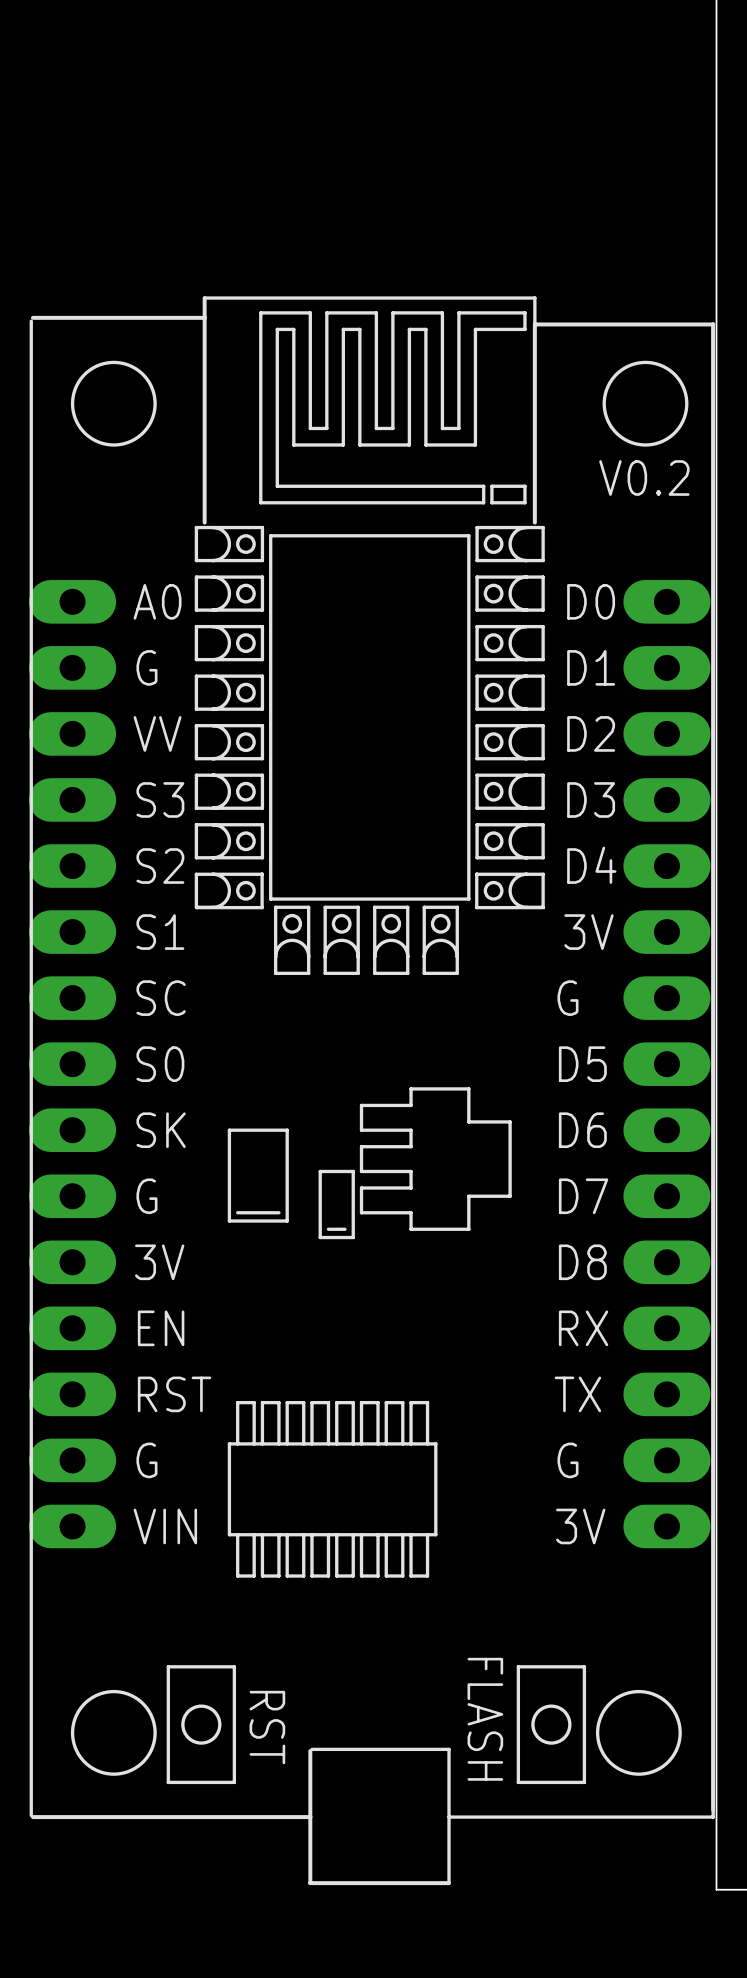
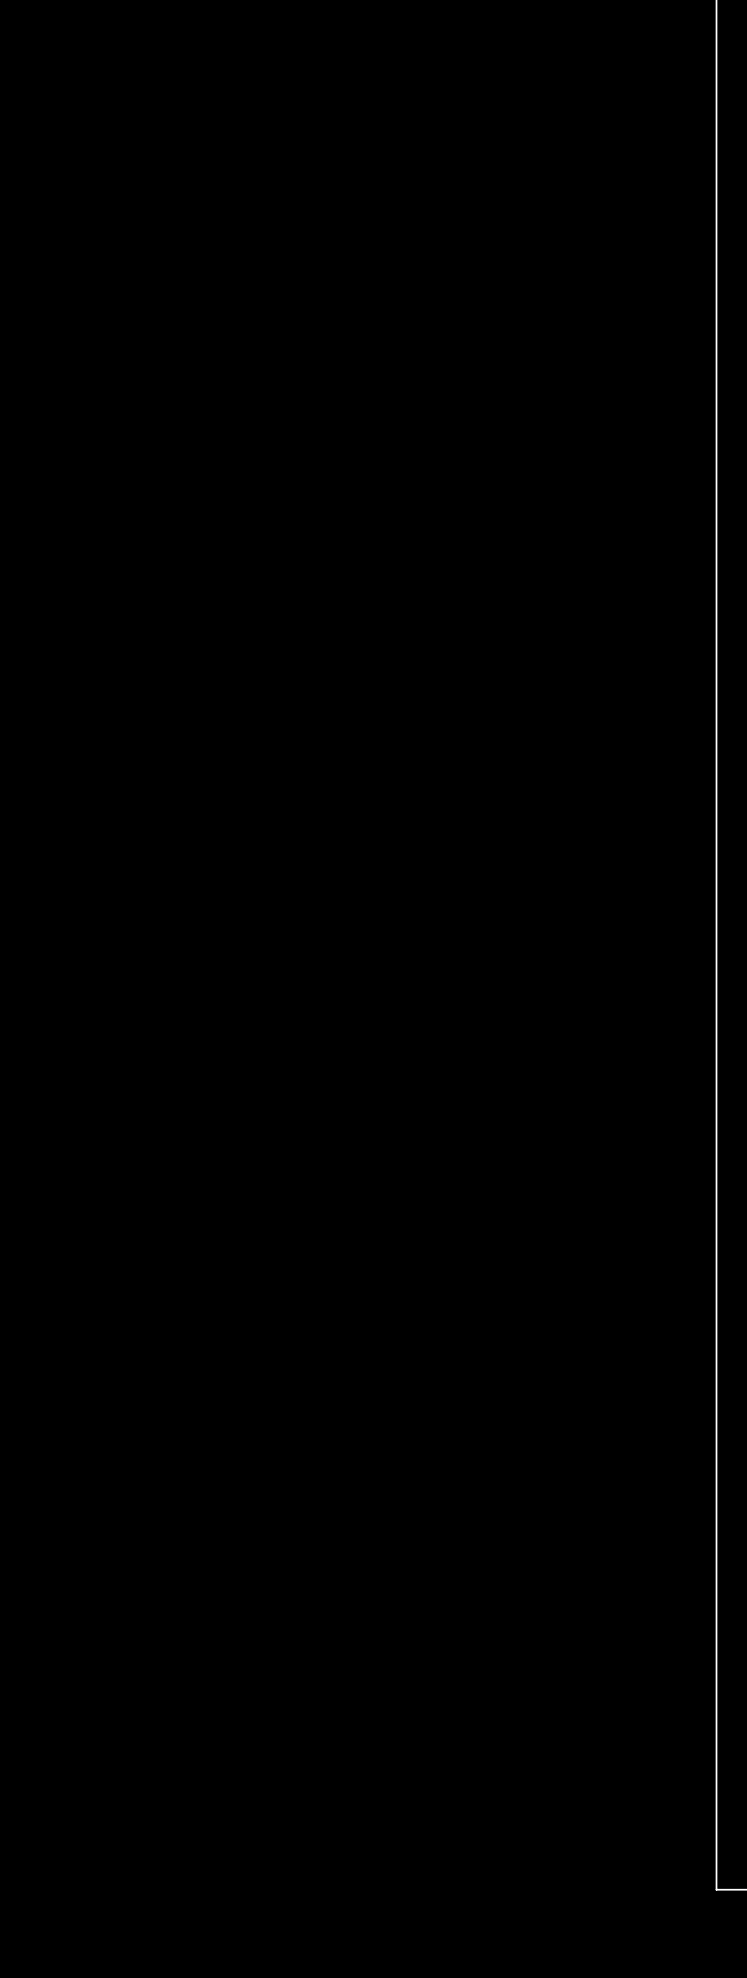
part: (372, 1090) -> none

